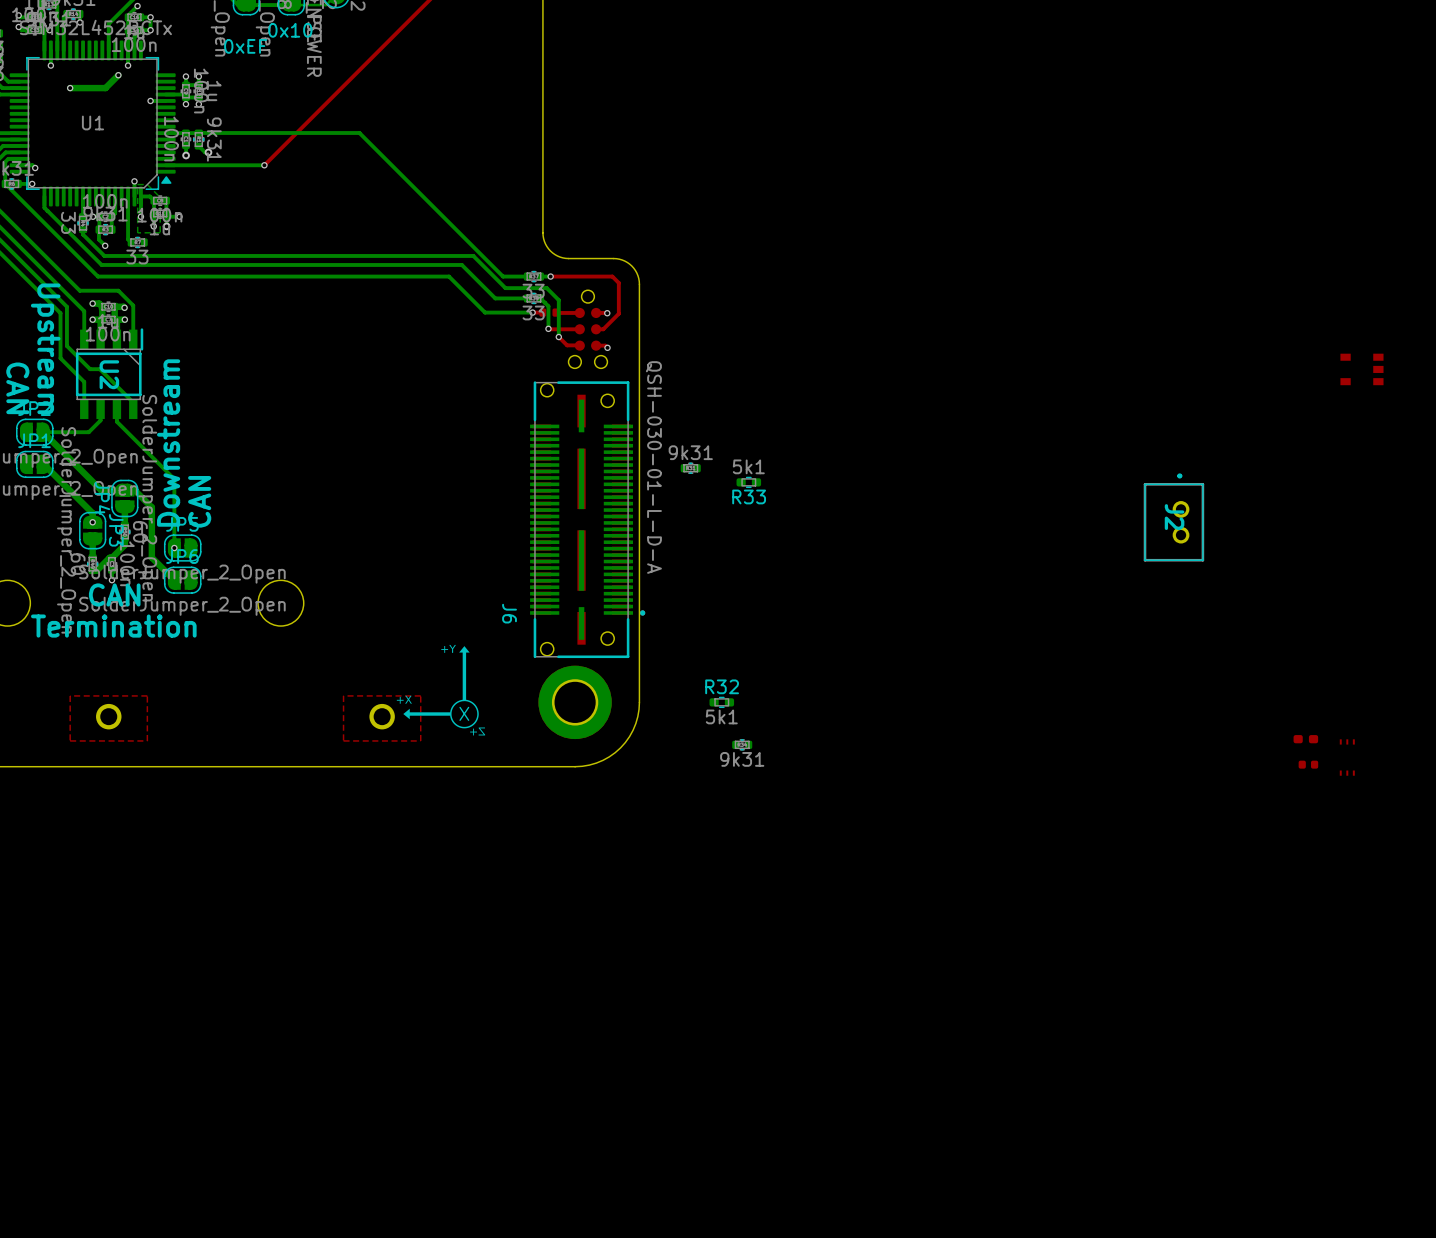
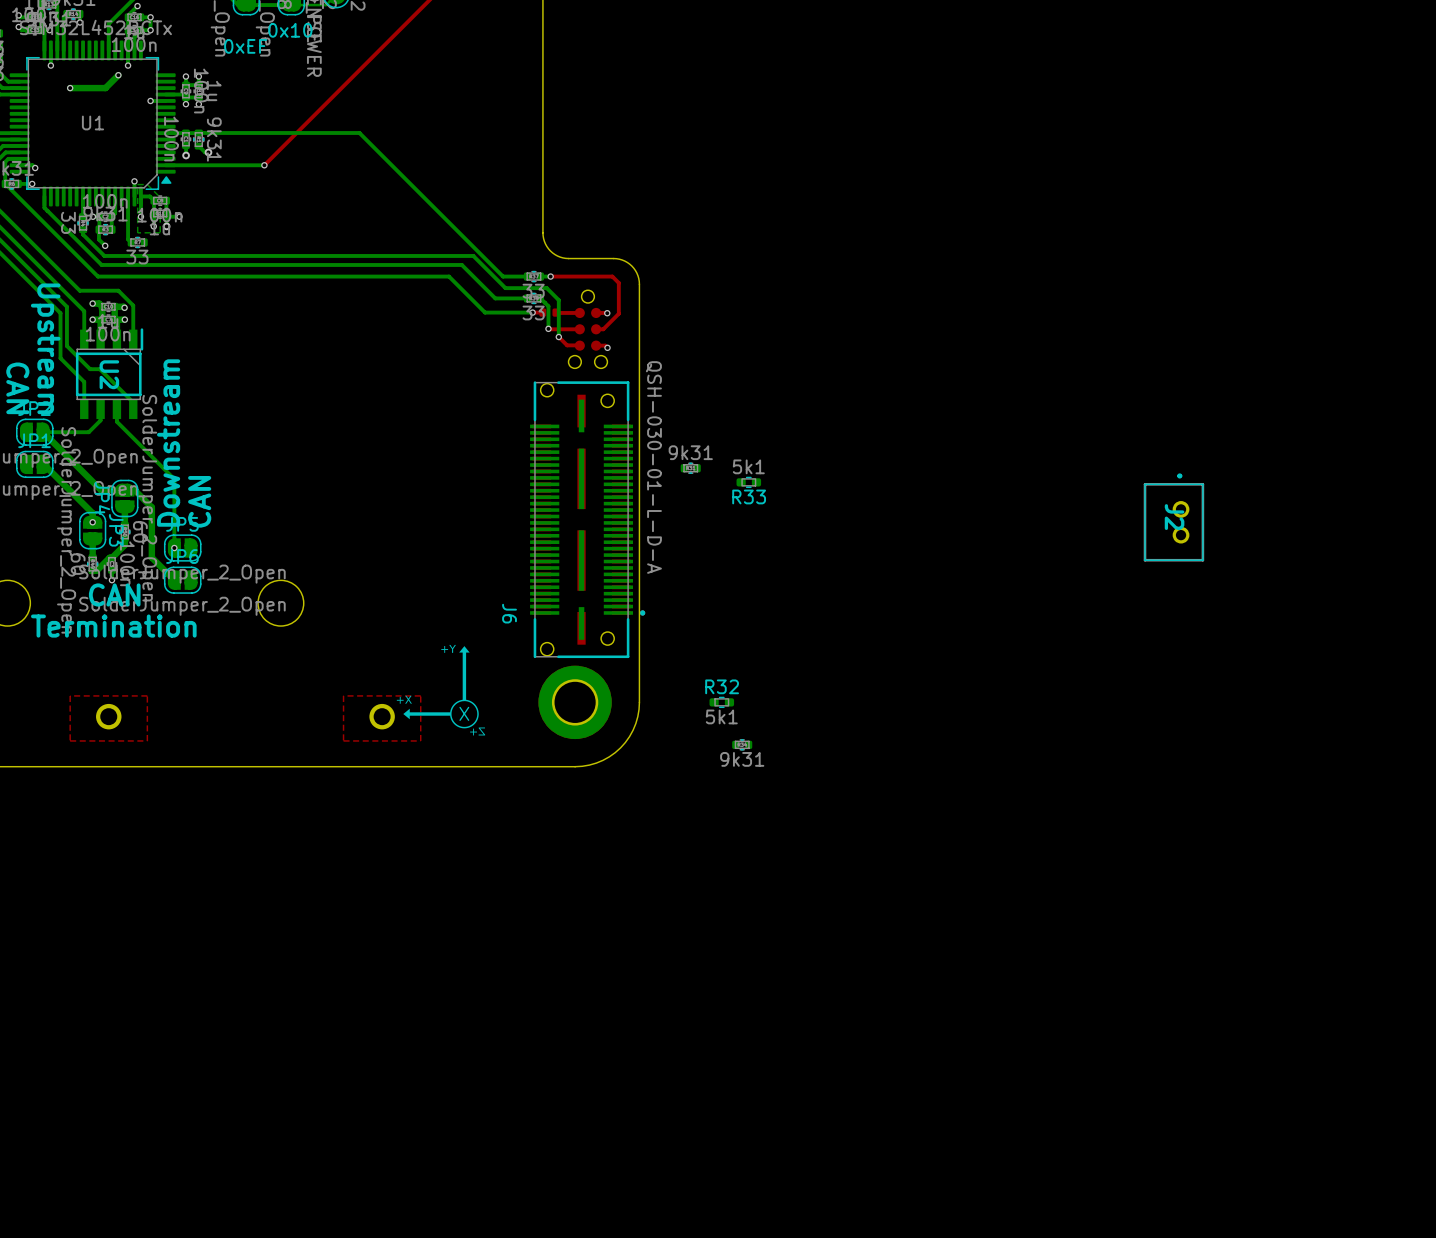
part: (1361, 369) -> none
part: (1305, 739) -> none
part: (1347, 741) -> none
part: (1308, 764) -> none
part: (1347, 773) -> none

